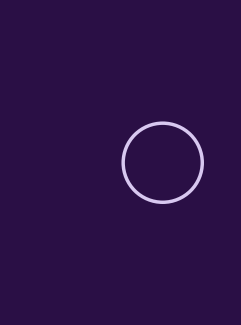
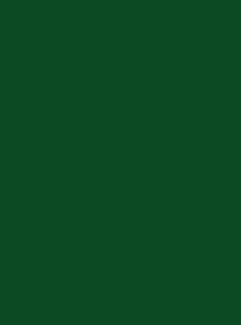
round board edge: [121, 121, 204, 204] -> none

